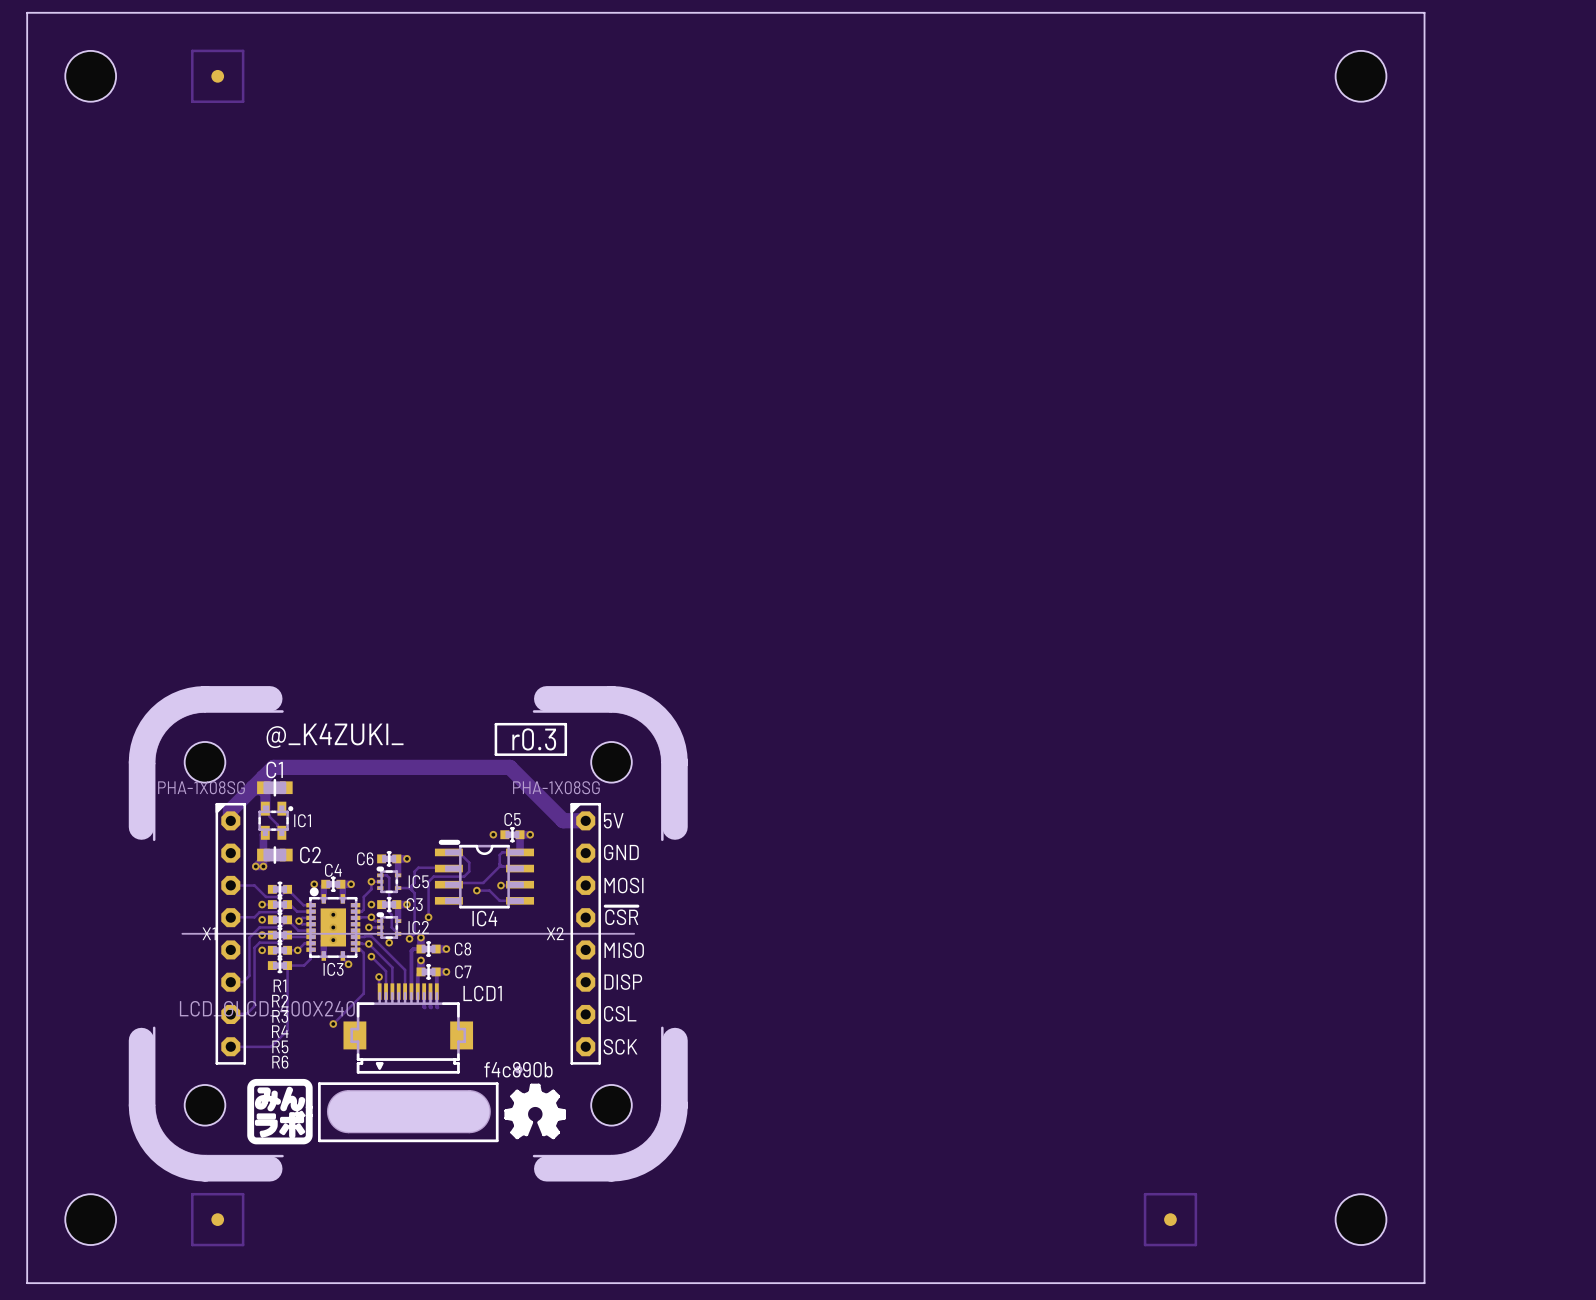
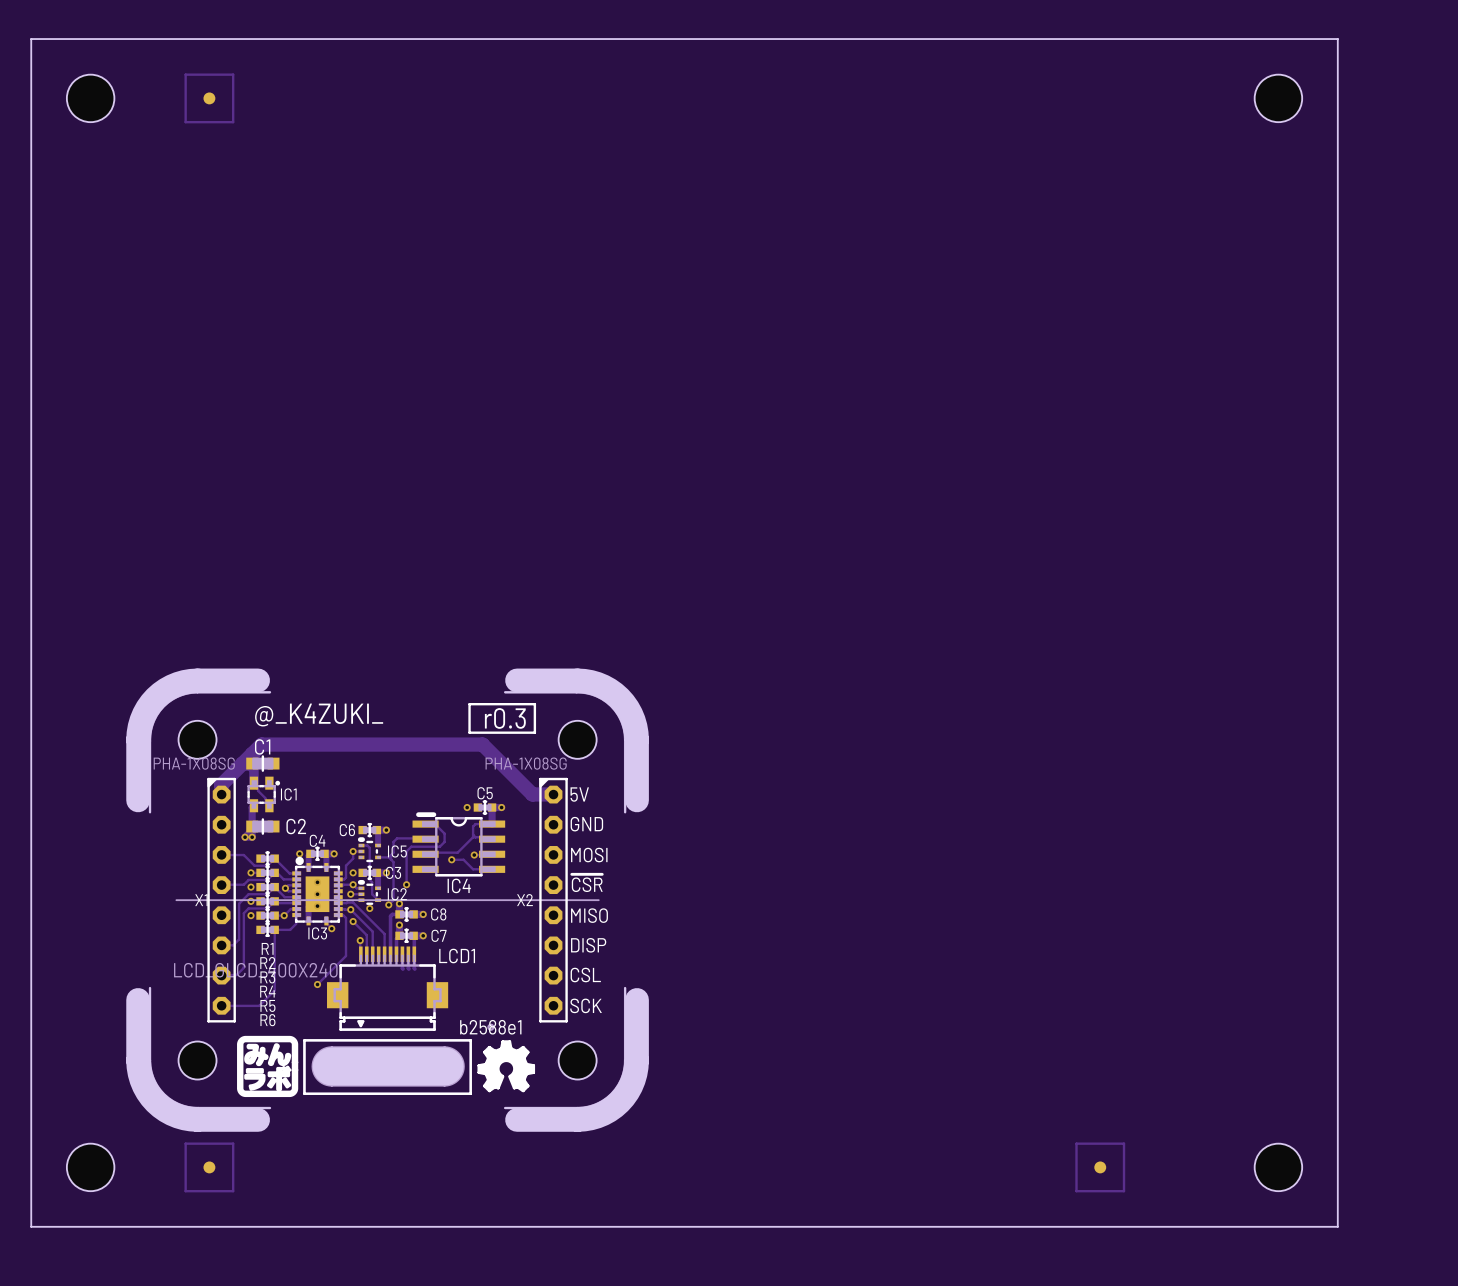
IC5 footprint: [376, 866, 402, 894] -> [357, 837, 382, 863]
IC2 footprint: [376, 912, 402, 939] -> [357, 879, 382, 905]
drawing shape: [484, 1061, 553, 1078] -> [460, 1019, 522, 1035]

